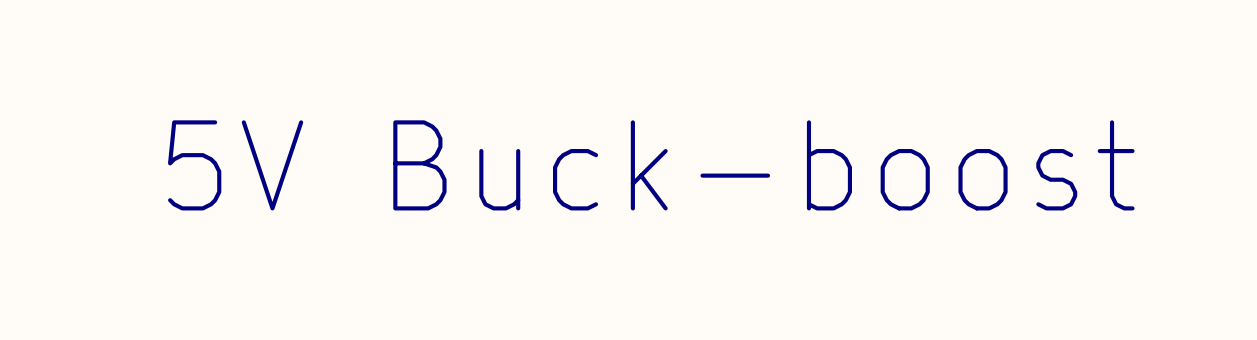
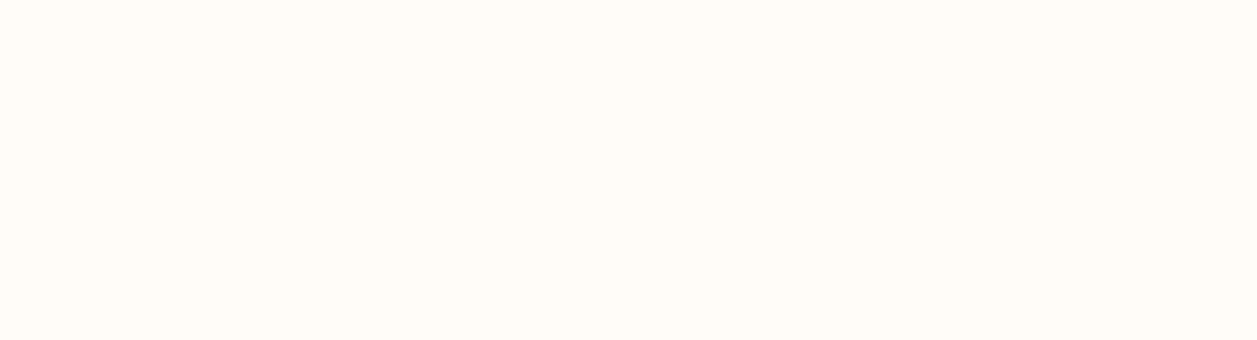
text: 5V Buck-boost (651, 165) -> none

